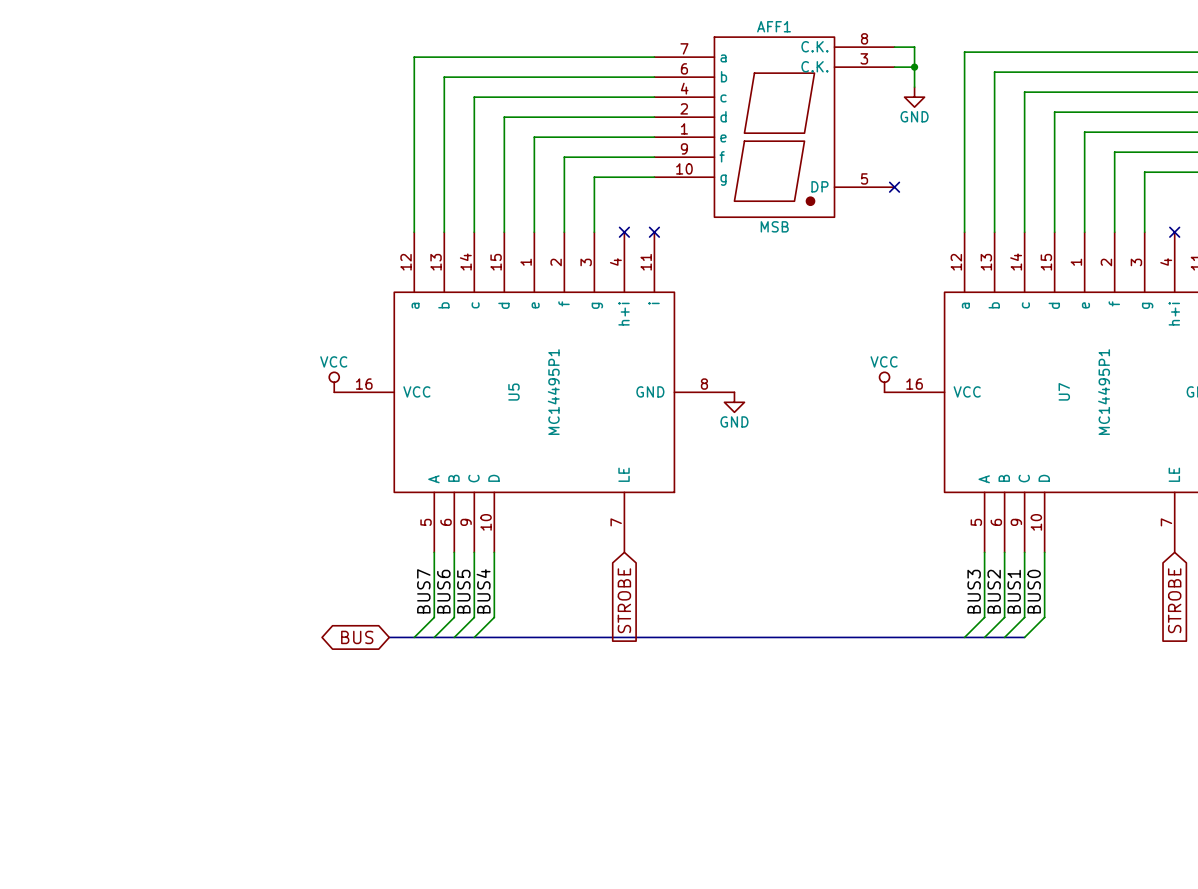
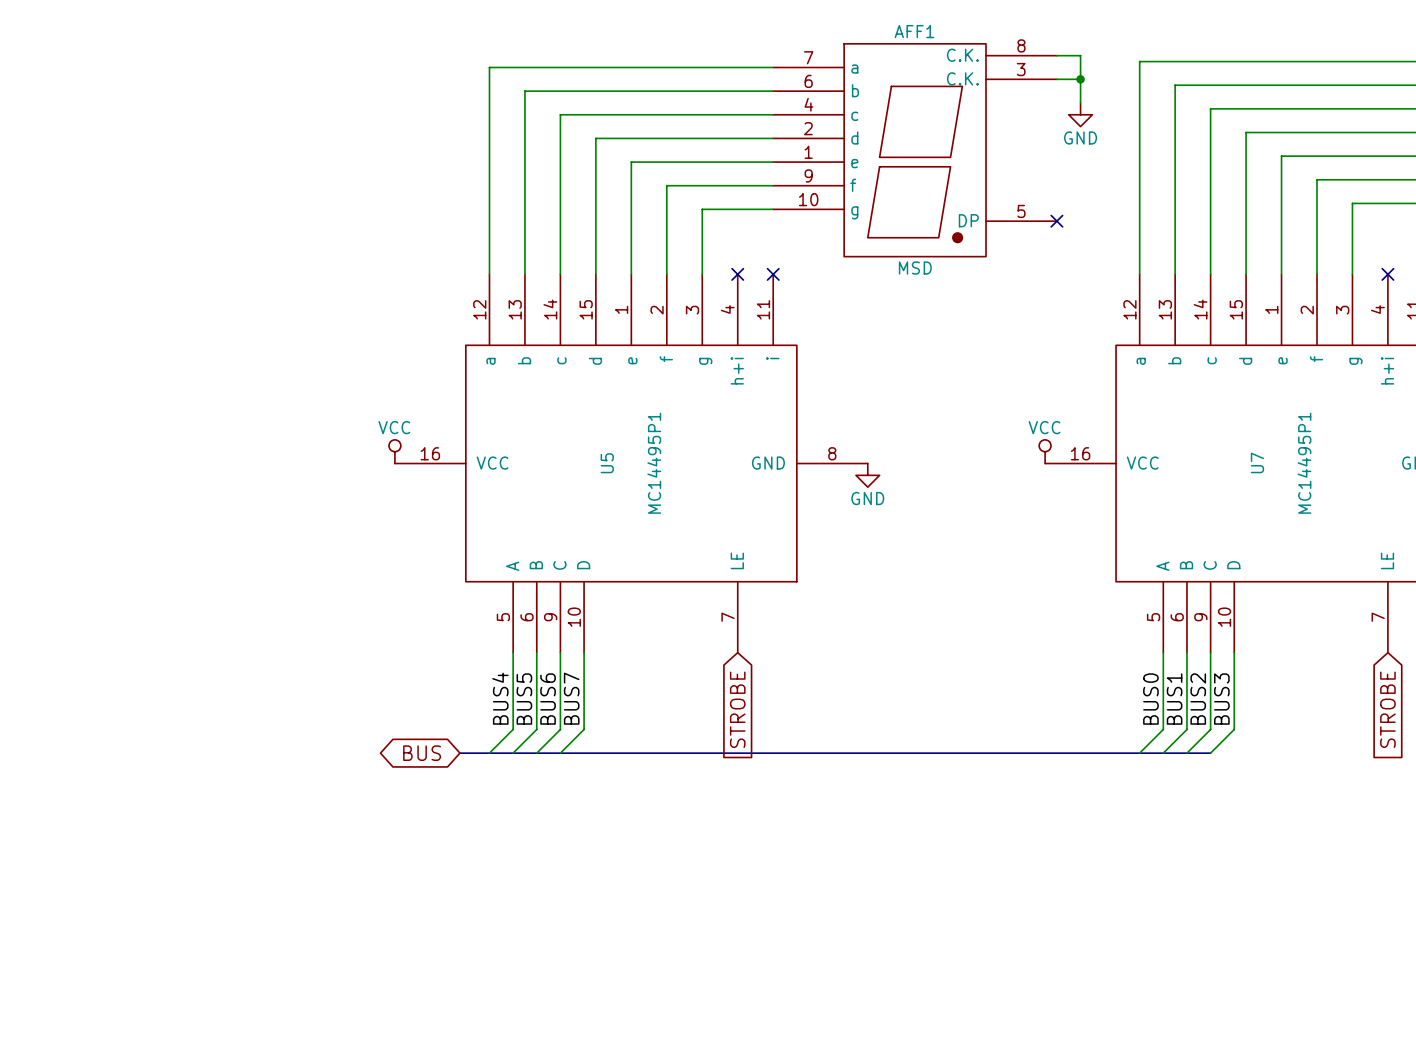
AFF1 value: MSB (774, 226) -> MSD (915, 268)
label: BUS7 (423, 591) -> BUS4 (500, 698)
label: BUS6 (443, 591) -> BUS5 (524, 699)
label: BUS5 (463, 591) -> BUS6 (548, 699)
label: BUS4 (483, 591) -> BUS7 (571, 698)
label: BUS3 (974, 591) -> BUS0 (1150, 699)
label: BUS2 (994, 591) -> BUS1 (1174, 699)
label: BUS1 (1014, 591) -> BUS2 (1198, 699)
label: BUS0 (1034, 591) -> BUS3 (1221, 699)

